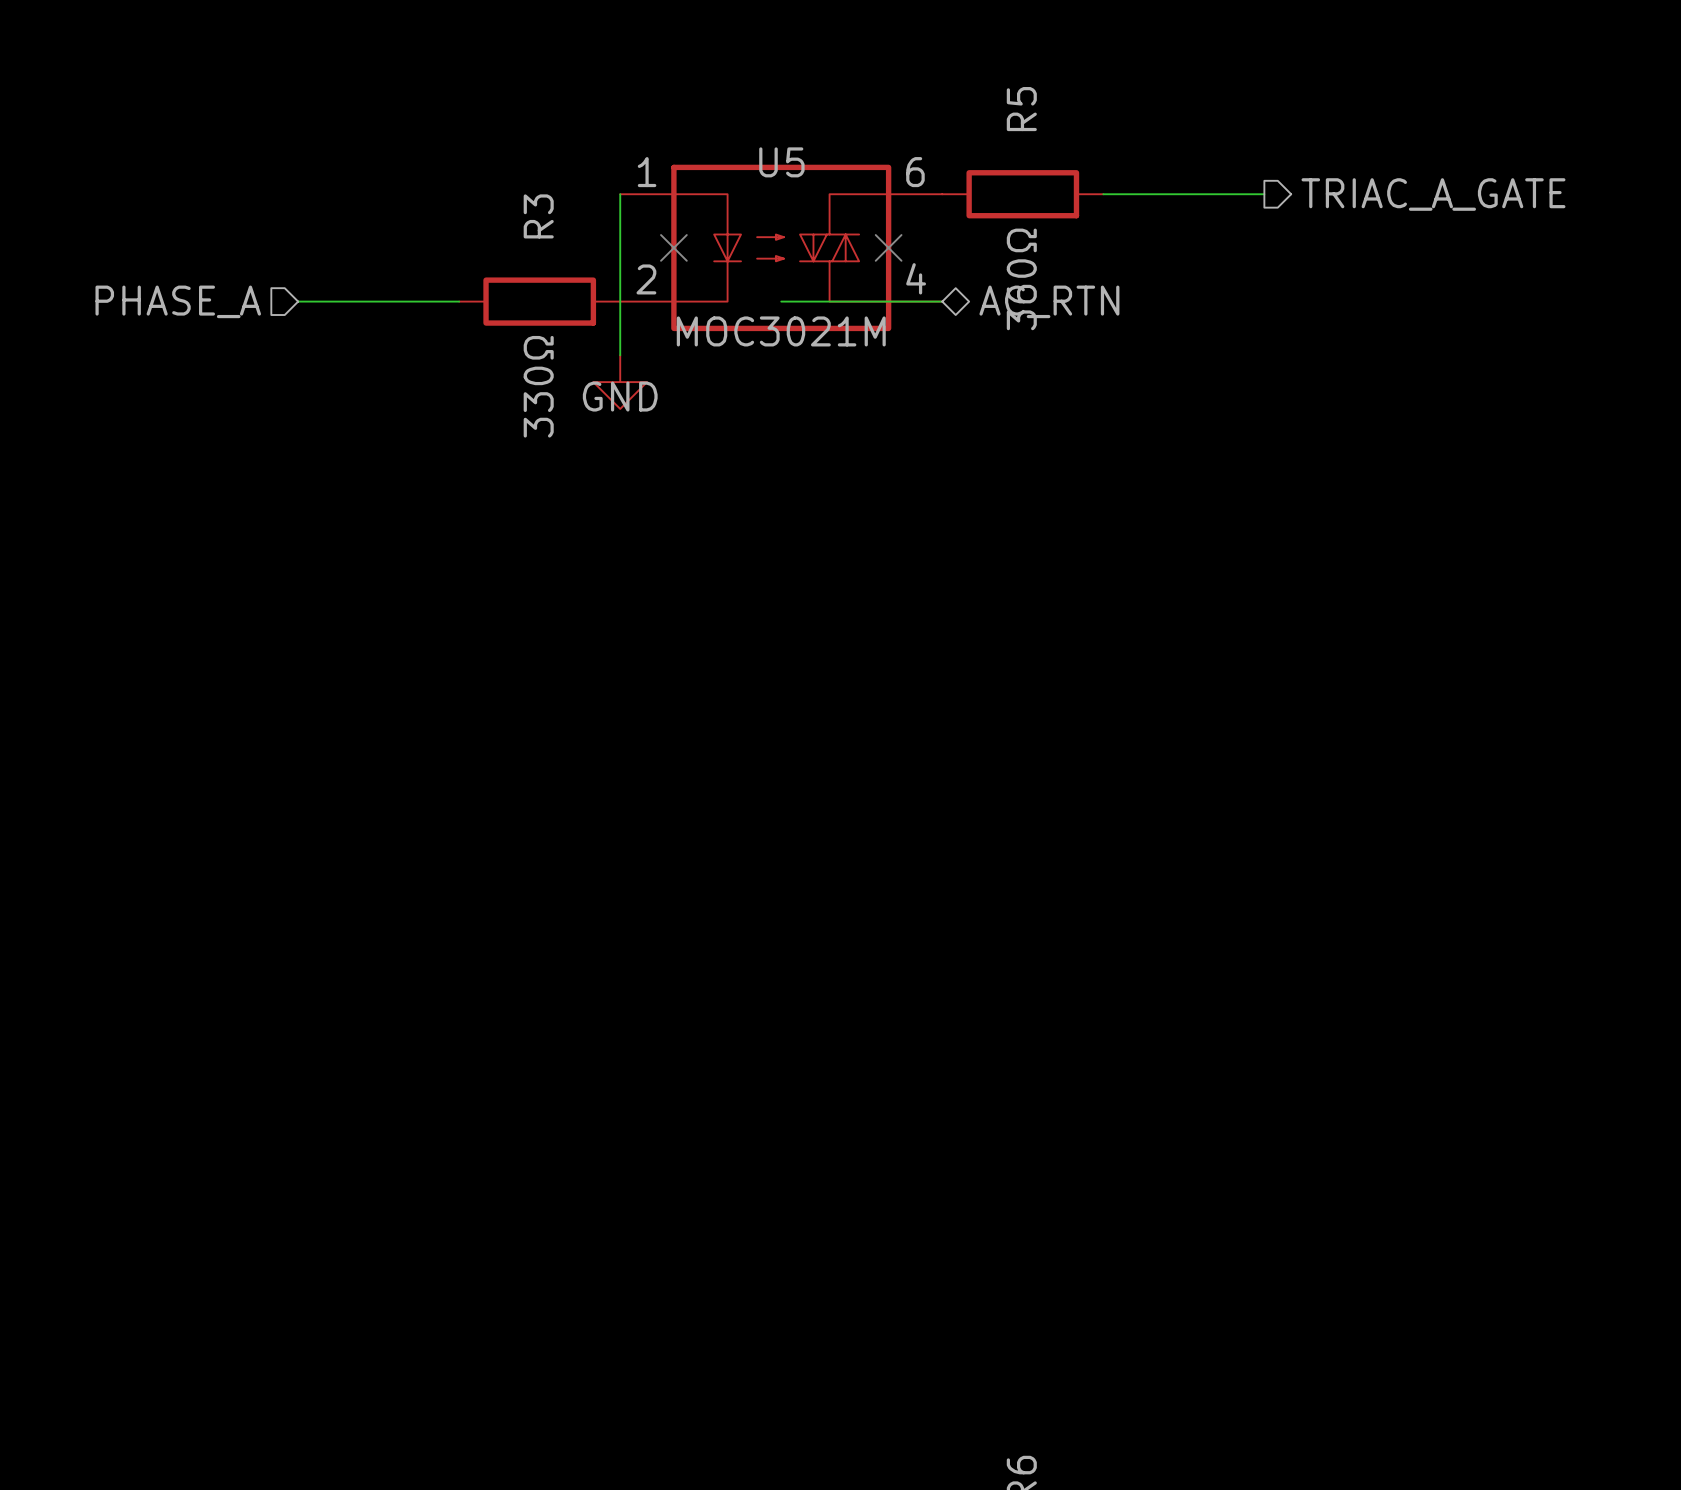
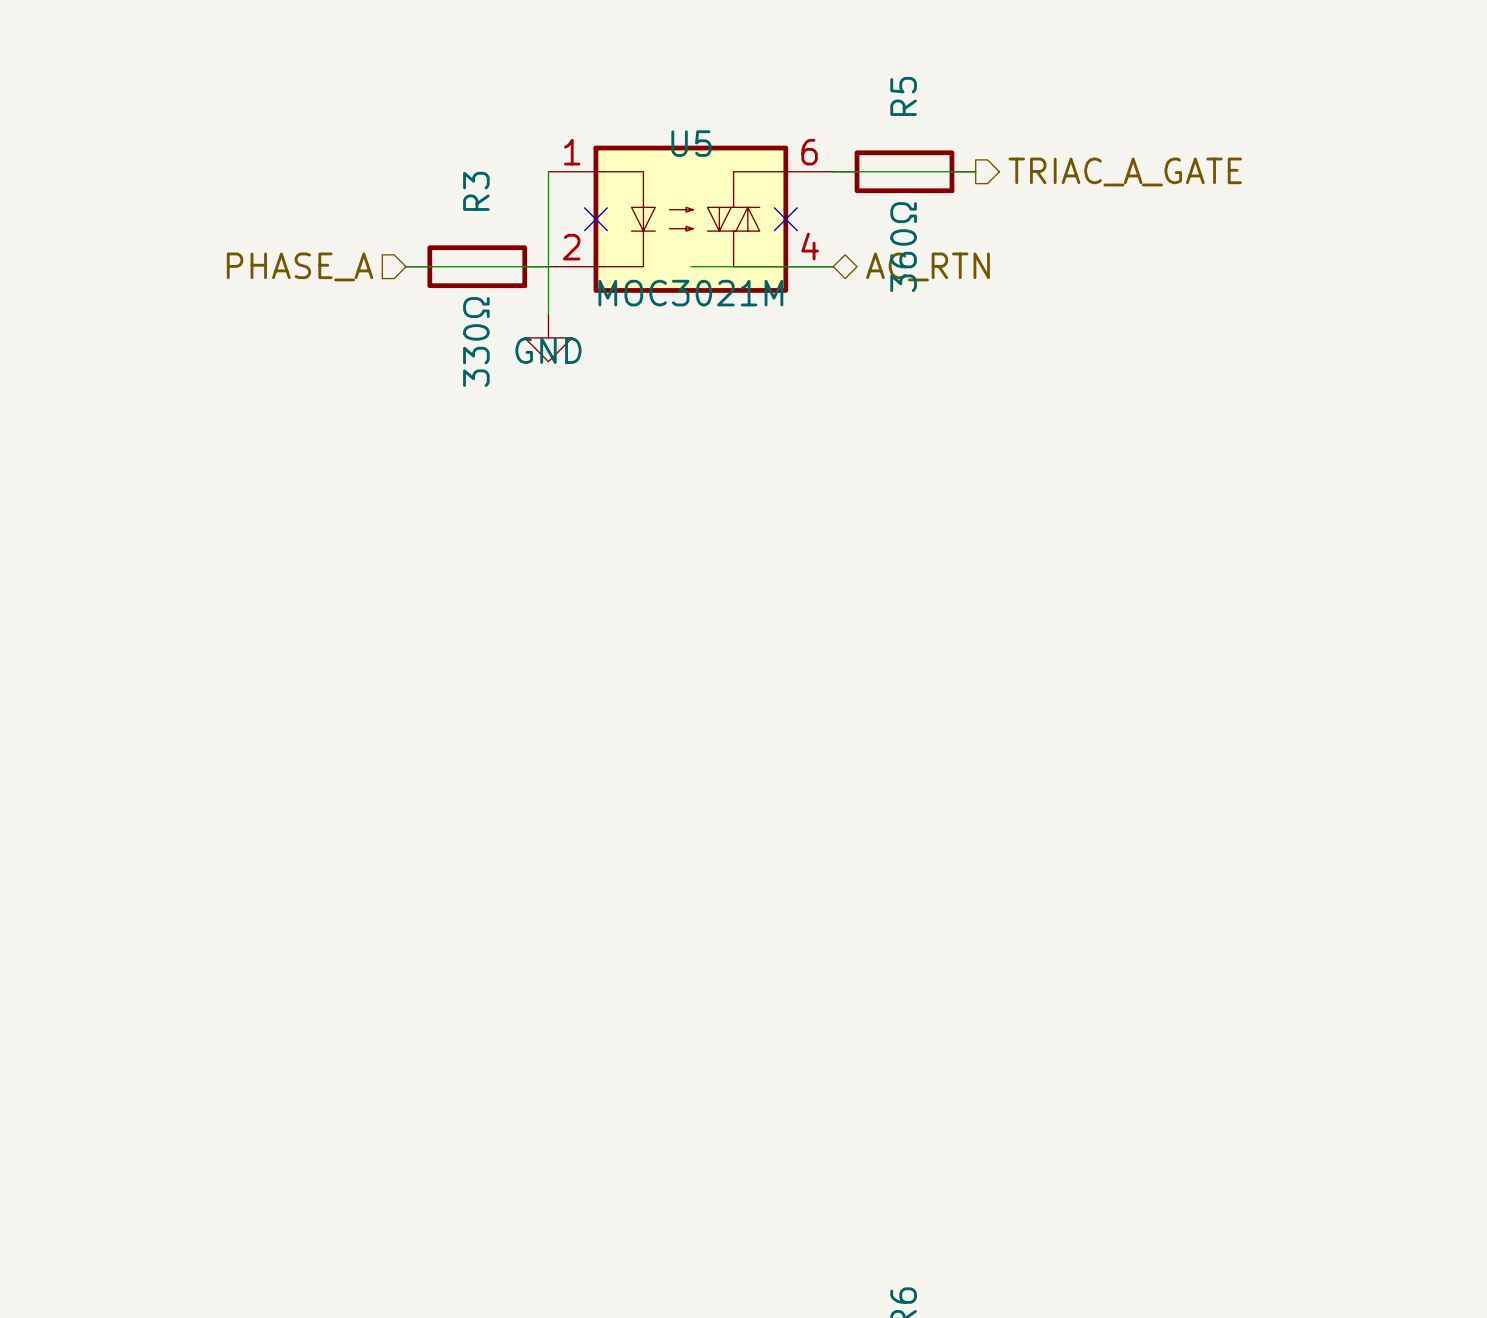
wire: (1103, 194) (1264, 194) -> (975, 171) (833, 171)
hierarchical label position: TRIAC_A_GATE (1433, 194) -> TRIAC_A_GATE (1125, 172)
hierarchical label position: PHASE_A (178, 301) -> PHASE_A (300, 266)
wire: (298, 301) (459, 301) -> (548, 266) (406, 266)

